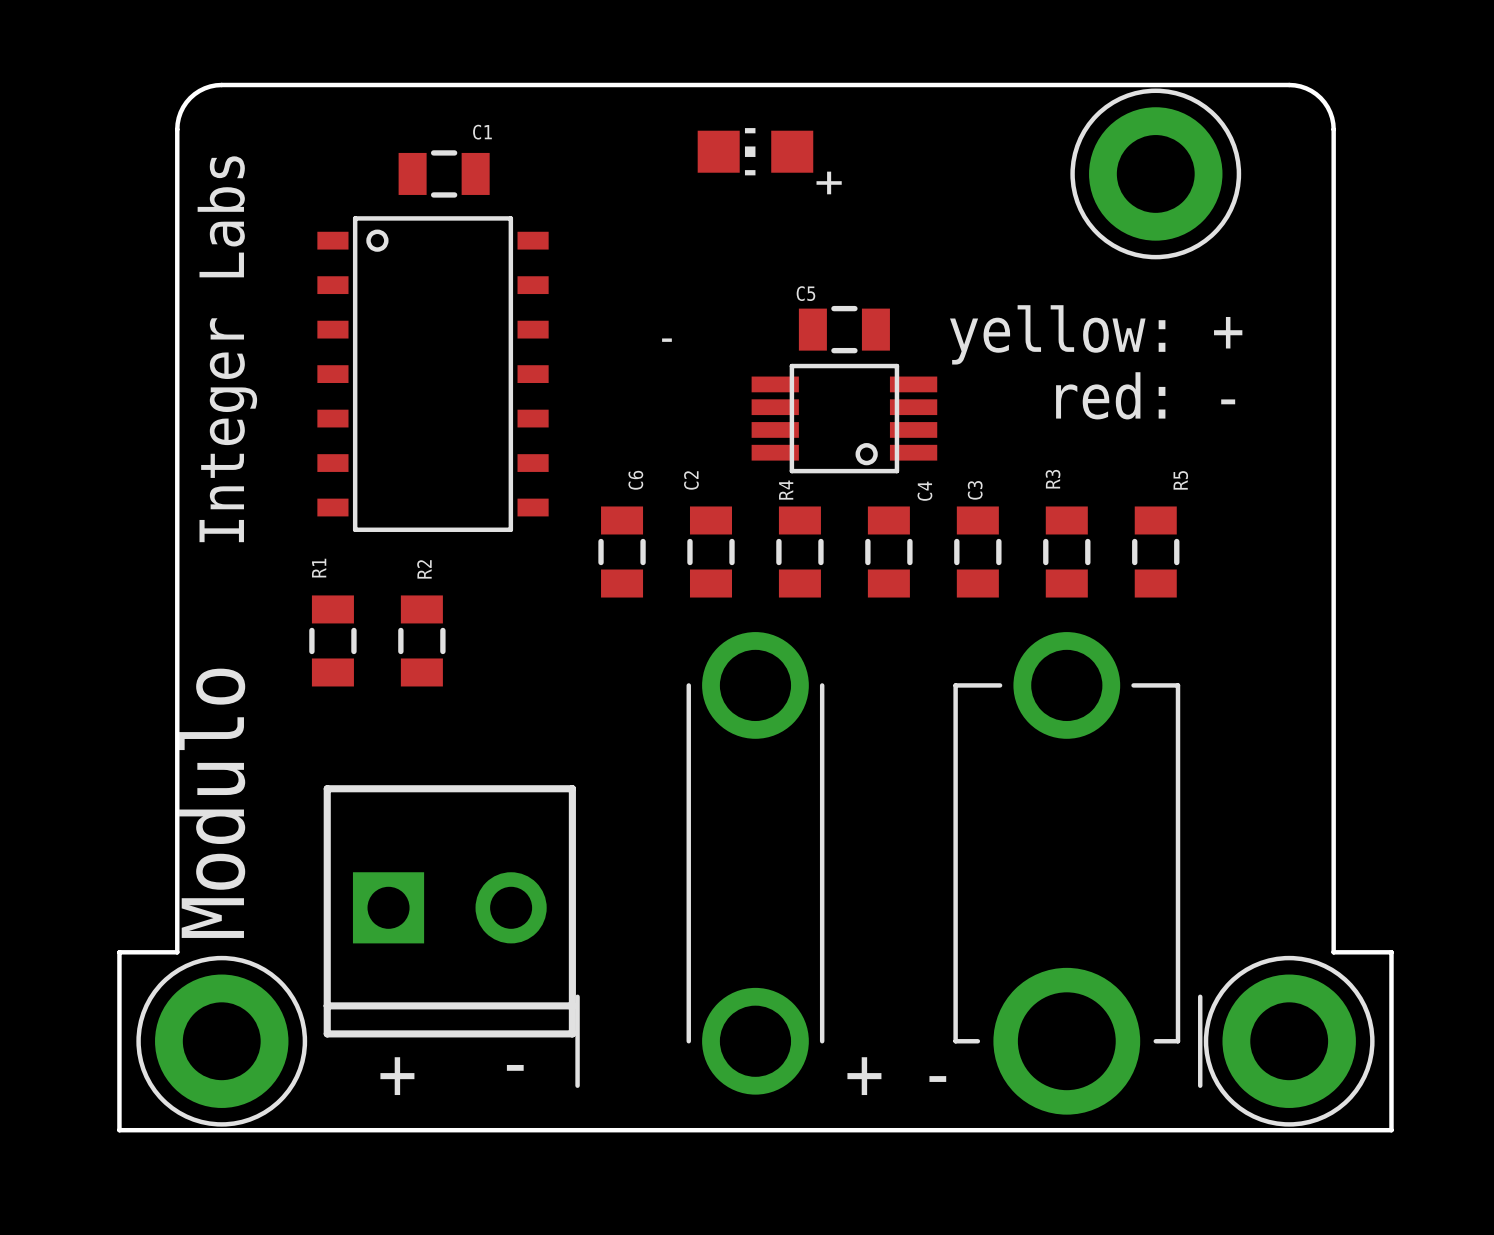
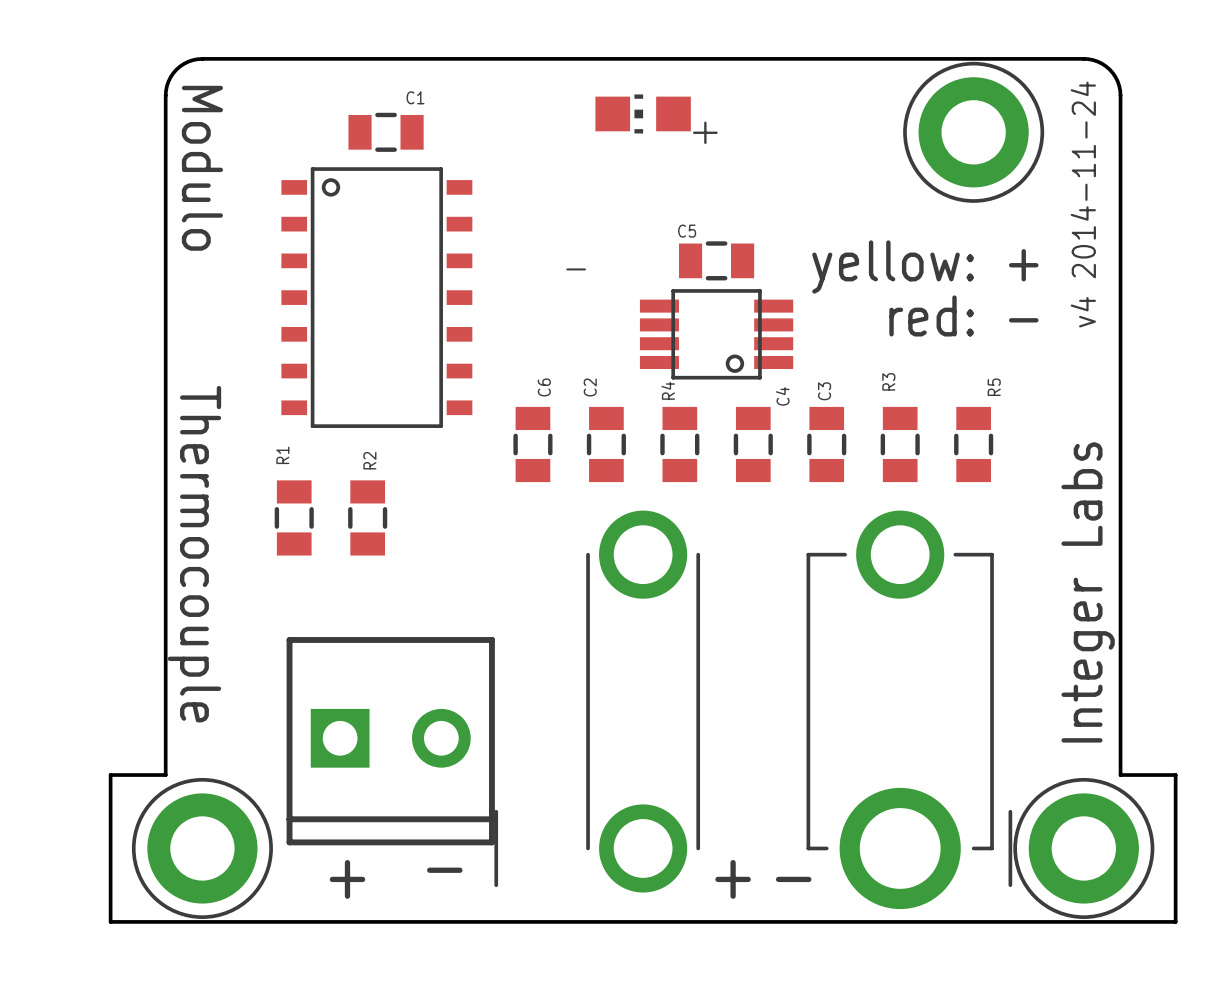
part footprint: [117, 82, 1394, 1133] -> [108, 57, 1178, 924]
text: none -> Modulo (202, 168)
text: none -> v4 2014-11-24 (1083, 204)
text: none -> Thermocouple (194, 554)
text: none -> Integer Labs (1088, 592)

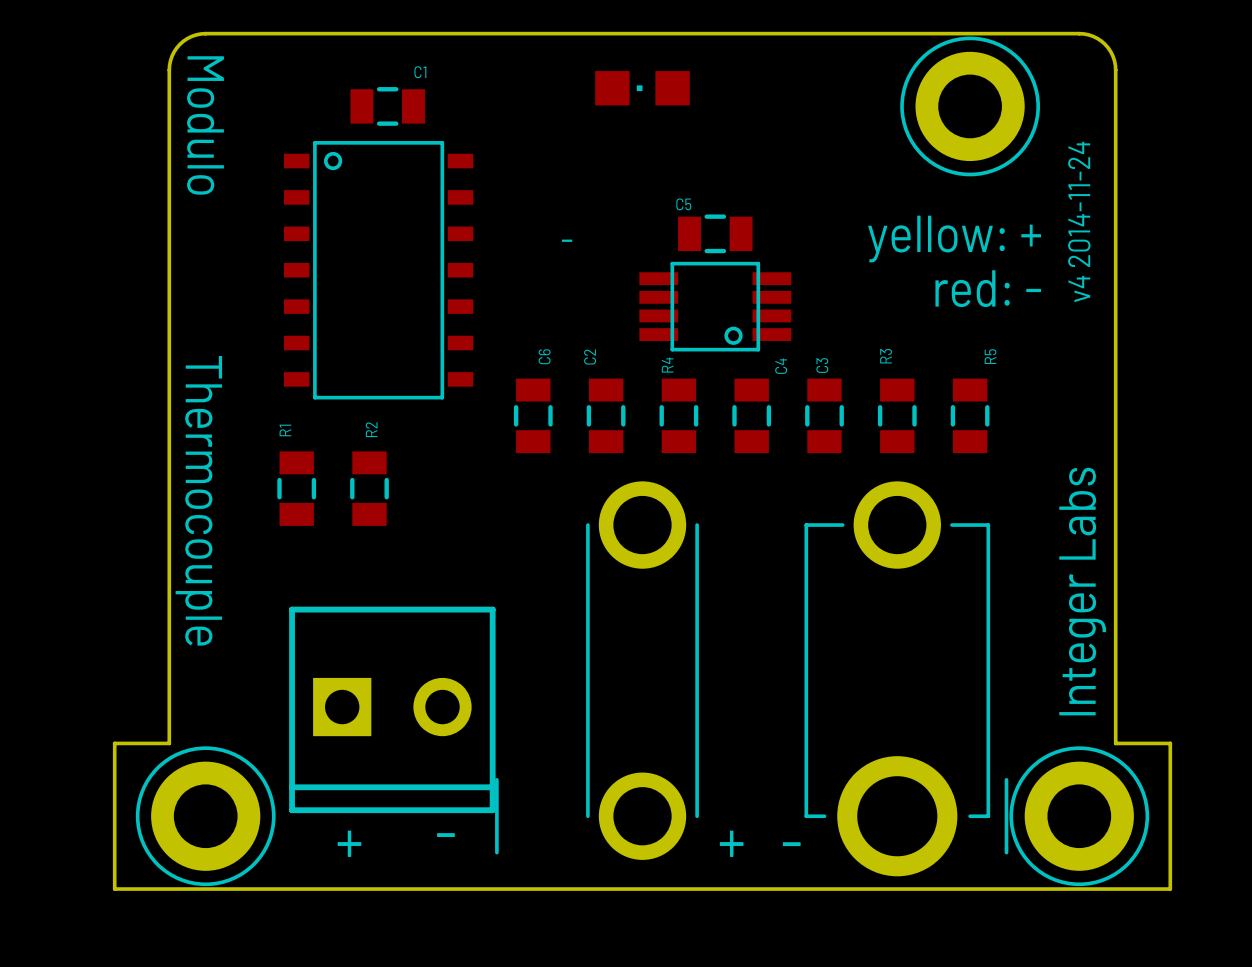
part footprint: [595, 94, 691, 134] -> [595, 71, 690, 106]

